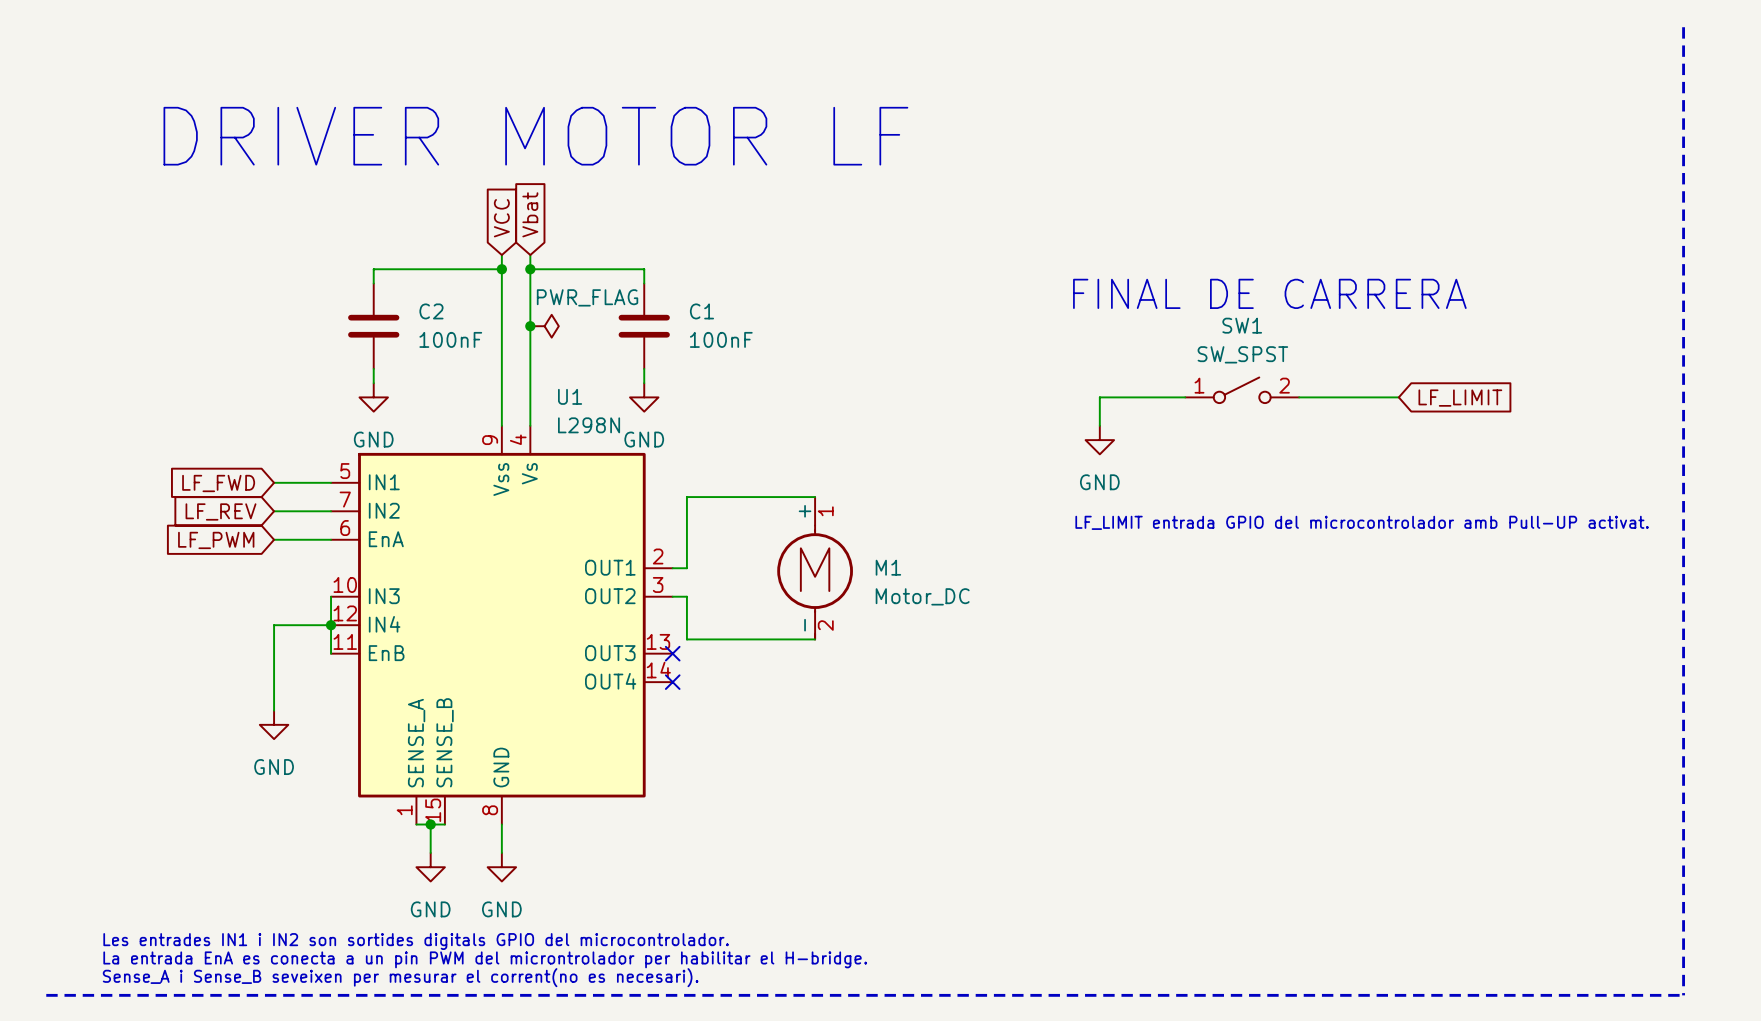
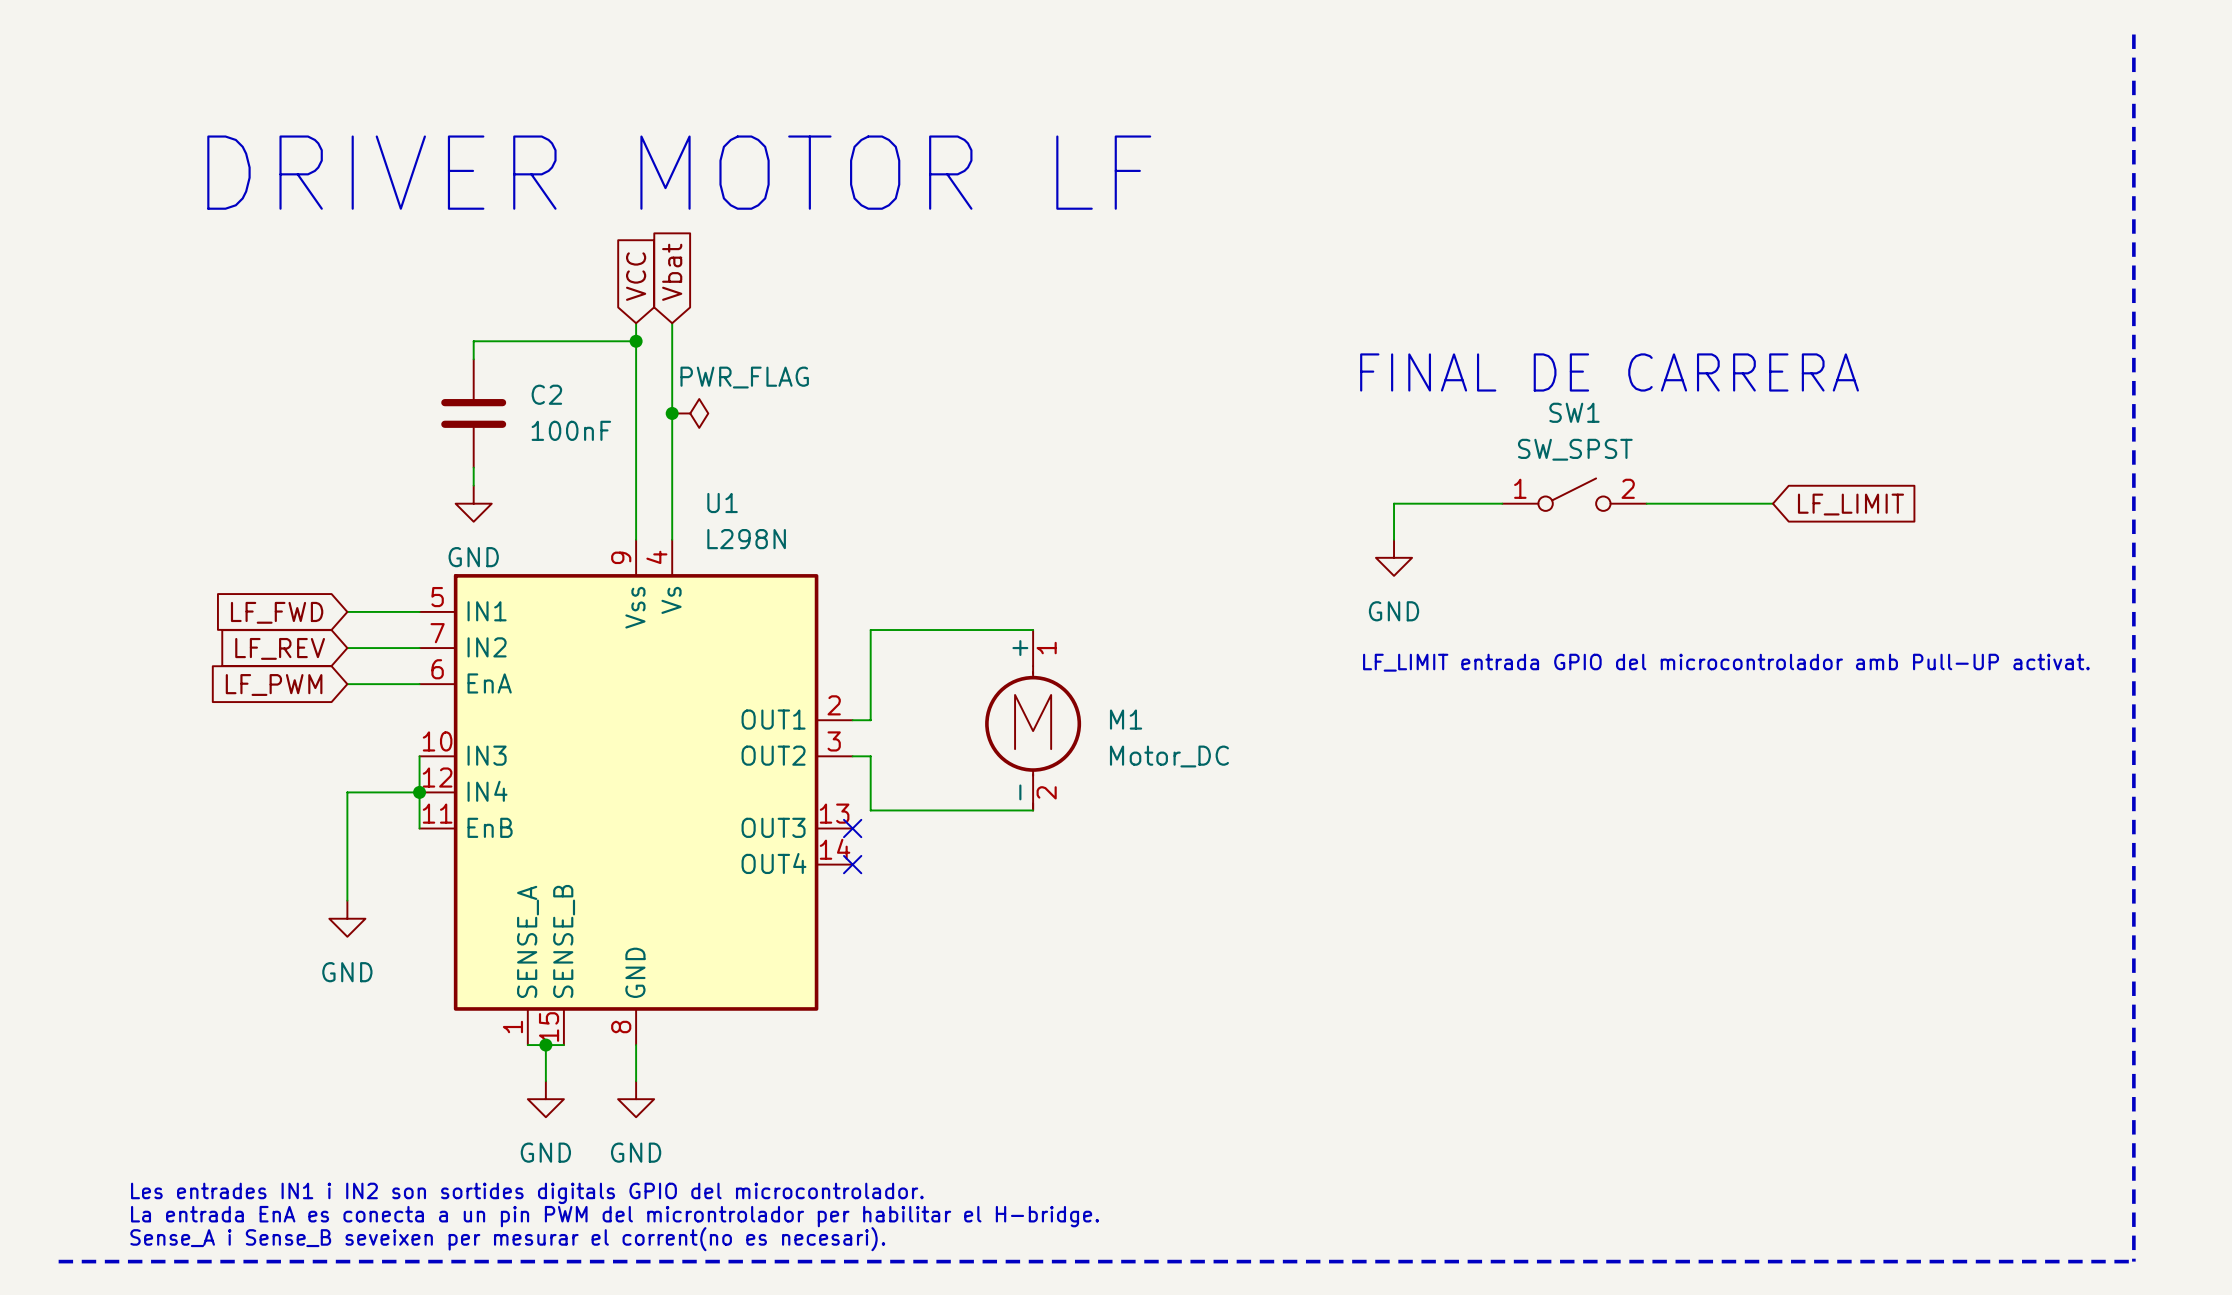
wire: (530, 269) (644, 269) (644, 283) -> none
junction: (530, 269) -> none
C1: 100nF (644, 326) -> none
wire: (644, 368) (644, 383) -> none
power symbol: GND (644, 397) -> none

